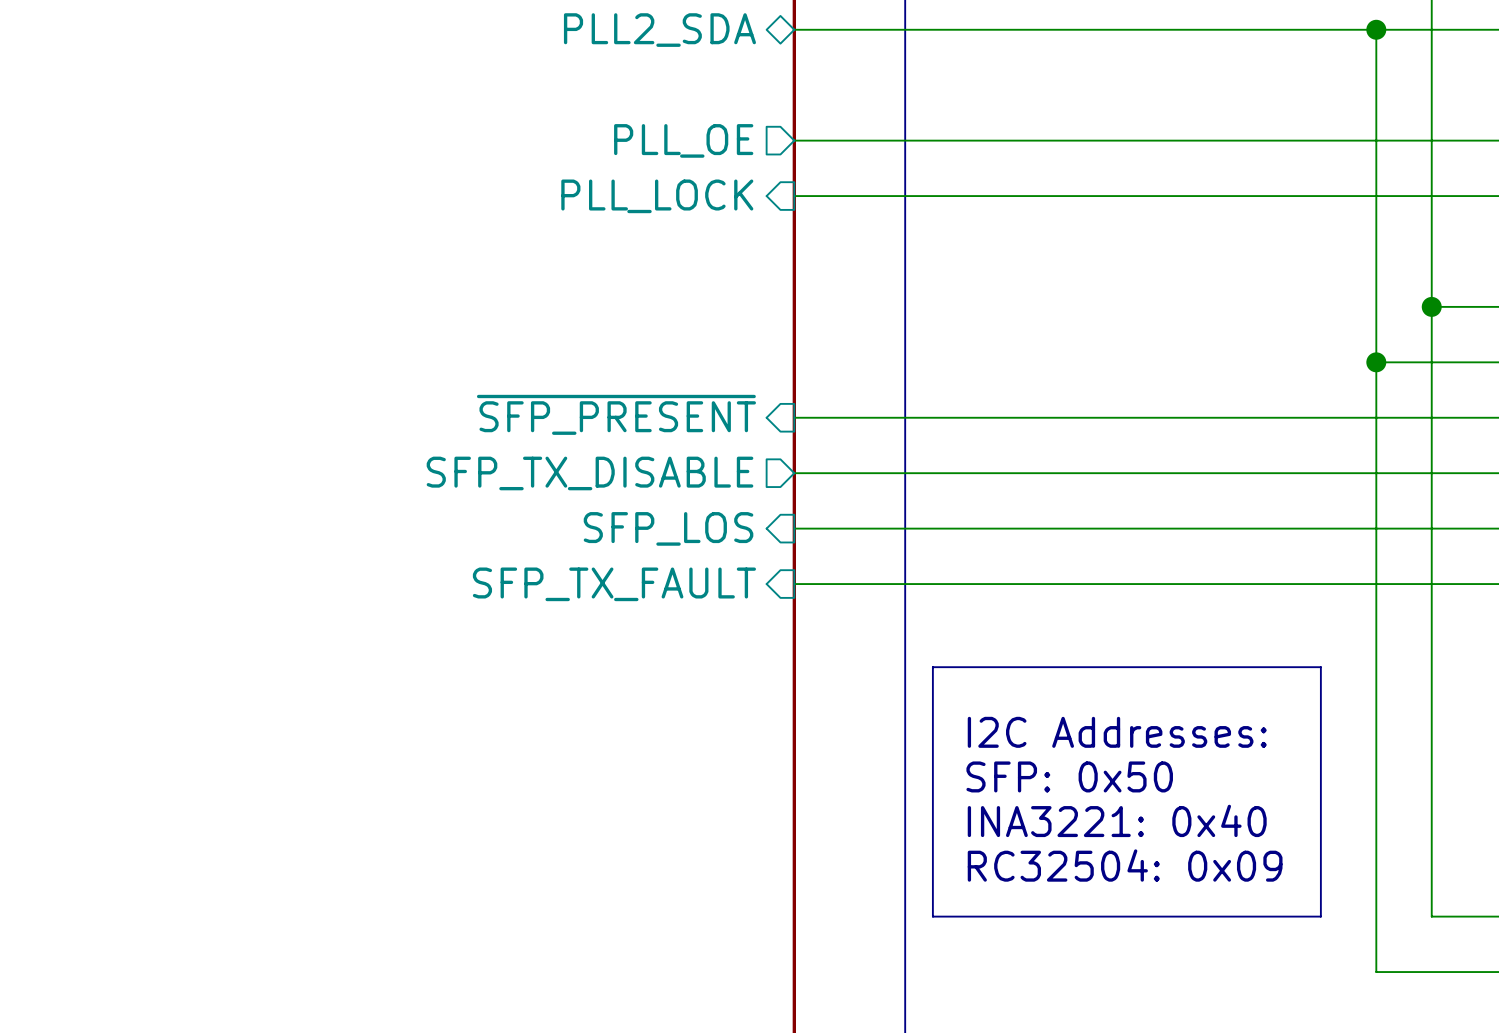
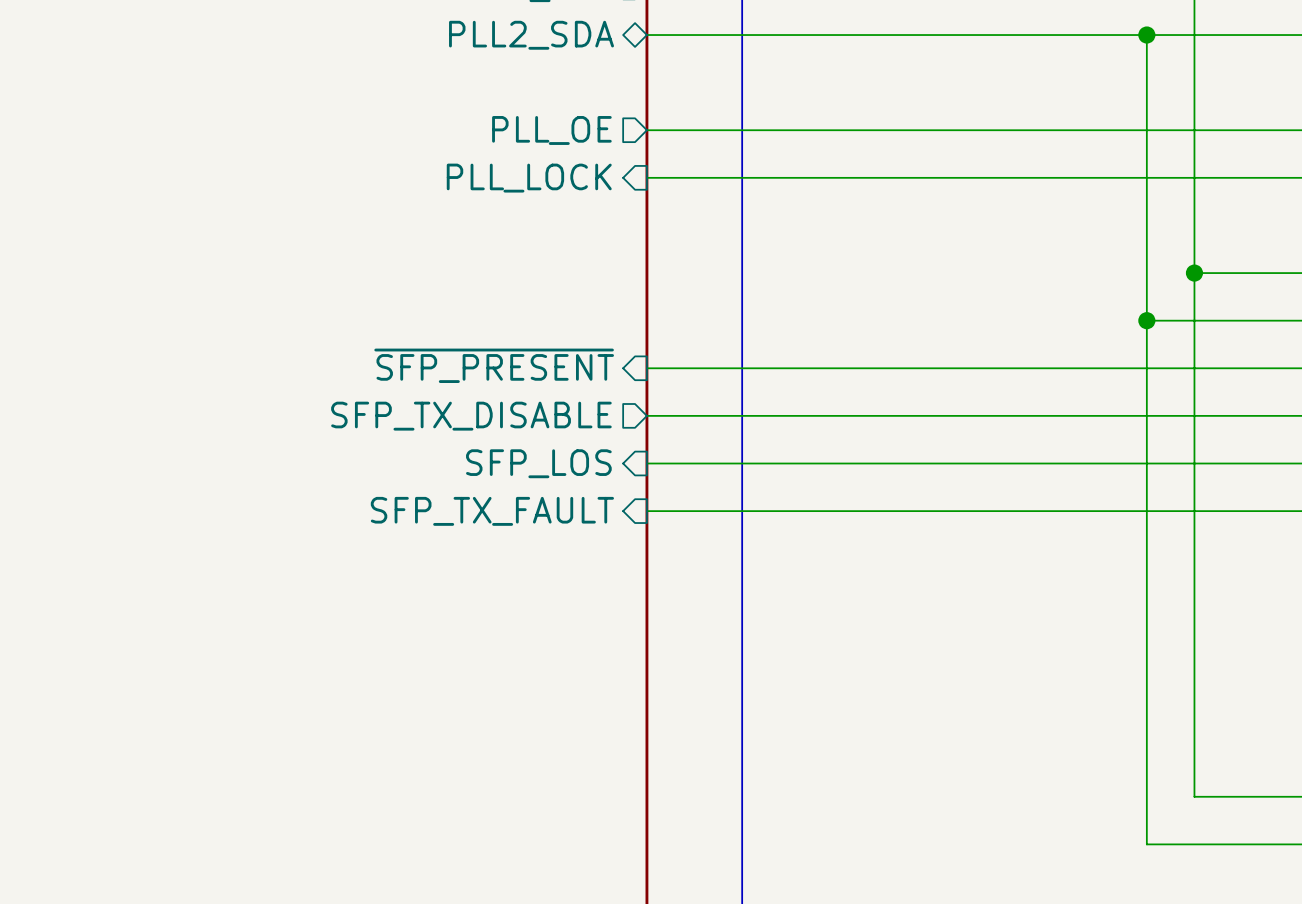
line: (932, 667) (932, 916) (1320, 916) (1320, 667) (932, 667) -> none
text: I2C Addresses: (1117, 732) -> none
text: SFP: 0x50 (1069, 776) -> none
text: INA3221: 0x40 (1117, 820) -> none
text: RC32504: 0x09 (1125, 865) -> none

